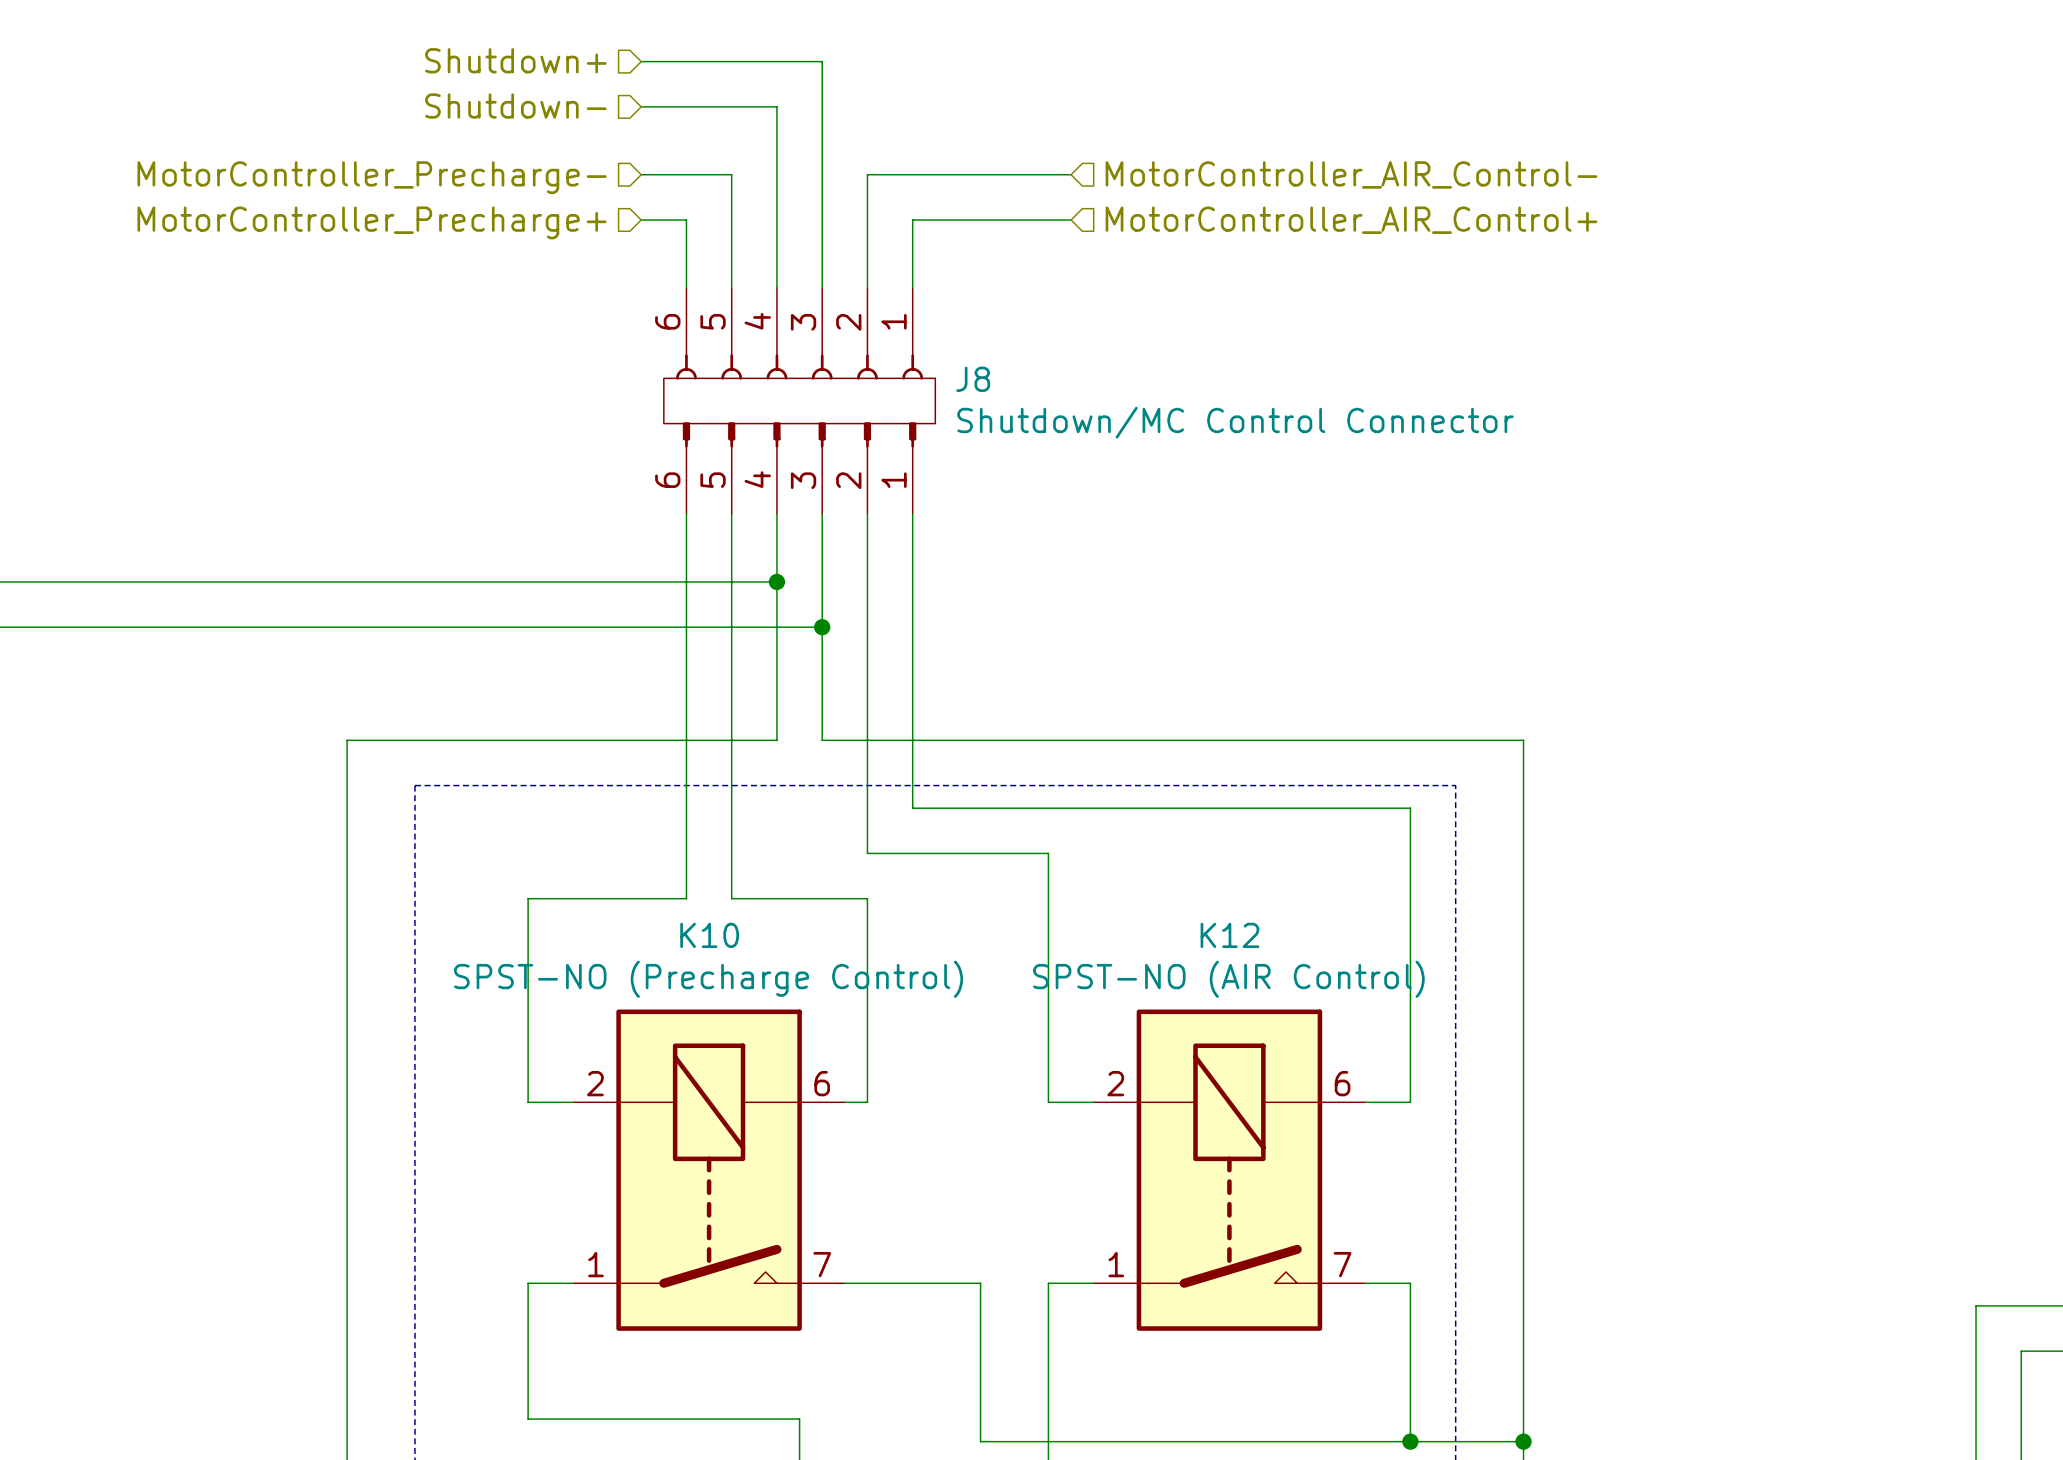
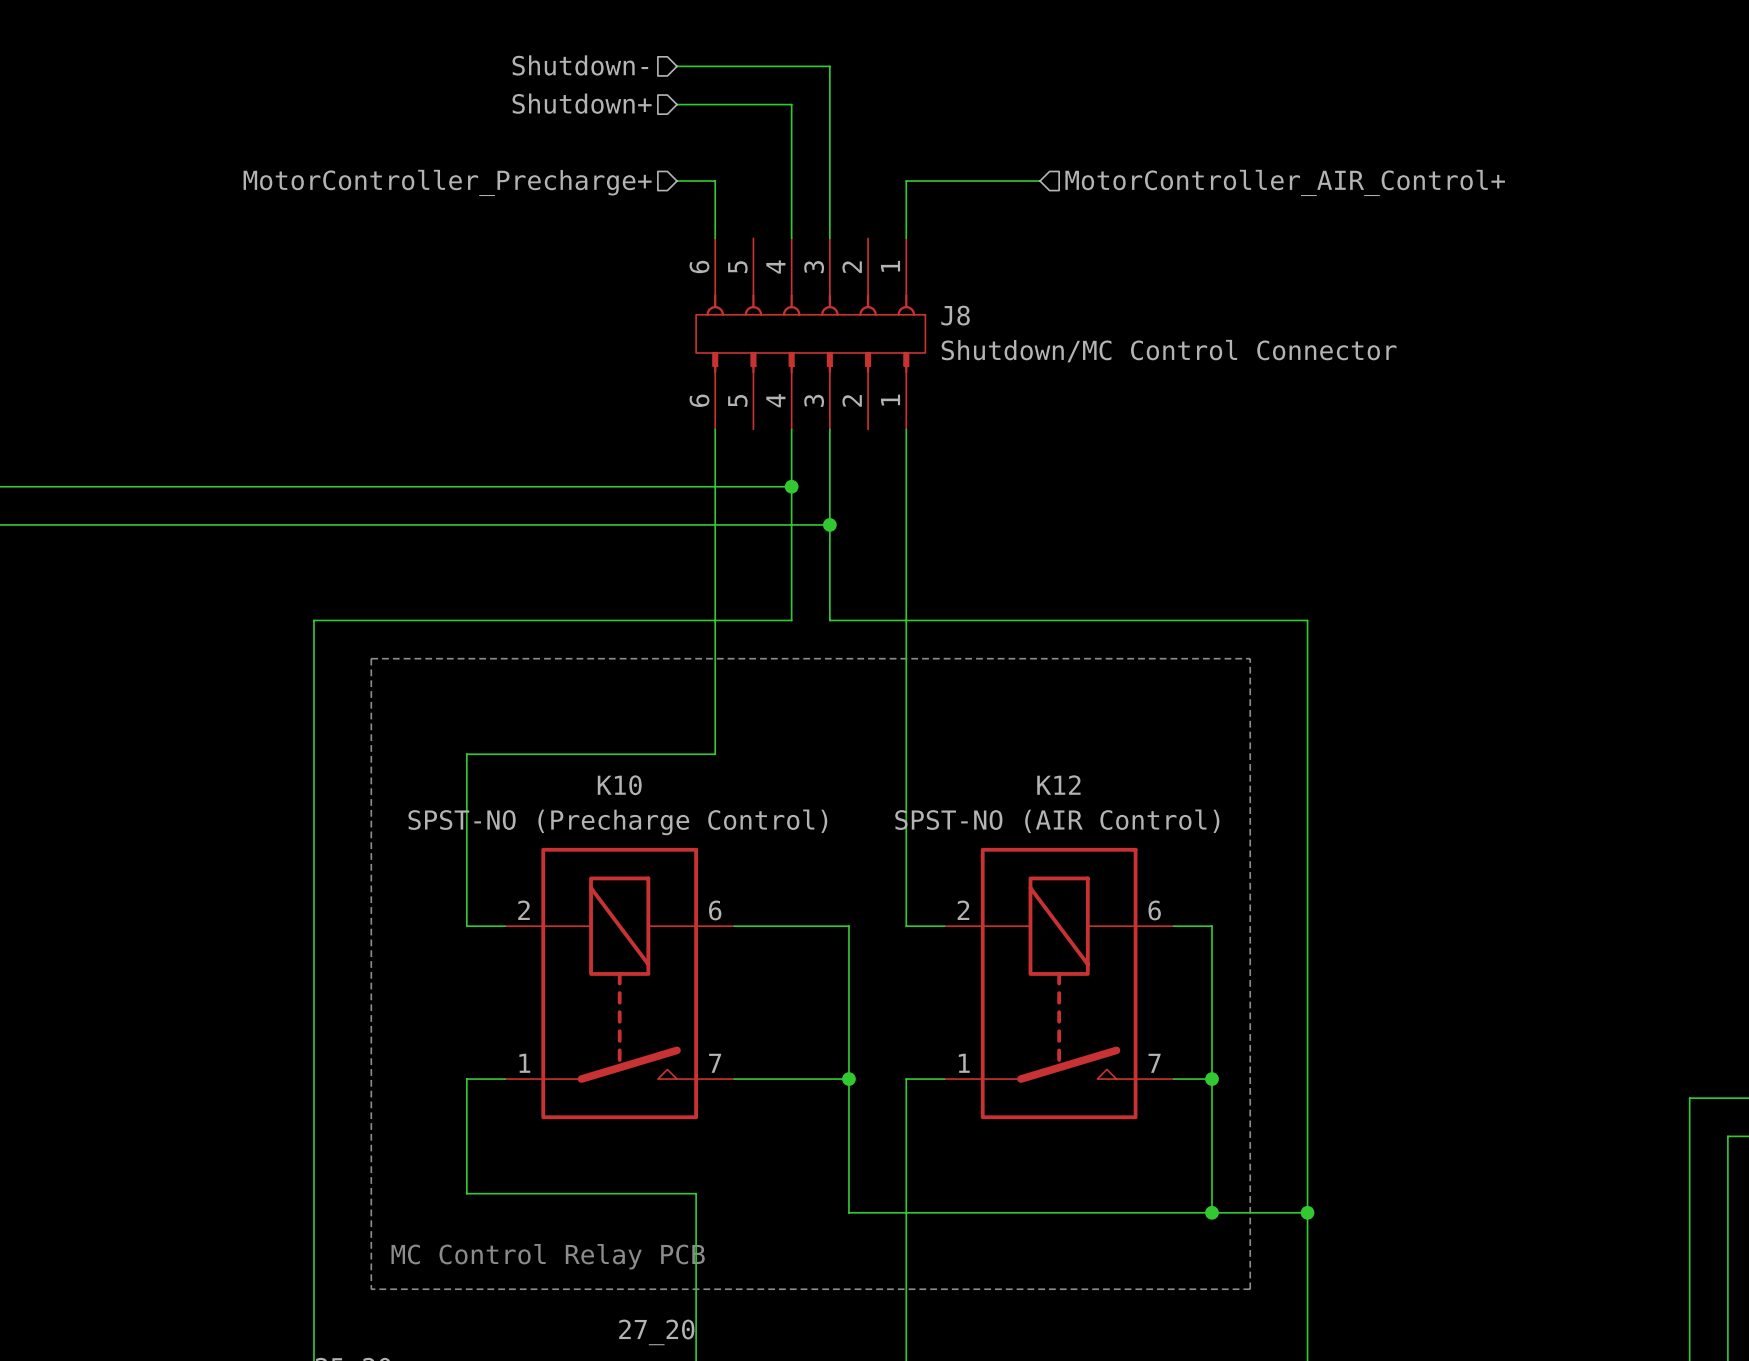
hierarchical label position: Shutdown+ (515, 60) -> Shutdown+ (582, 103)
wire: (641, 61) (822, 61) (822, 219) -> (677, 181) (715, 181)
wire: none -> (677, 66) (829, 66) (829, 238)
hierarchical label position: Shutdown- (515, 106) -> Shutdown- (580, 65)
wire: (641, 106) (776, 106) (776, 287) -> none
wire: none -> (677, 104) (791, 104) (791, 181)
wire: (641, 174) (731, 174) (731, 287) -> none
wire: (1071, 174) (867, 174) (867, 287) -> none
hierarchical label: MotorController_AIR_Control- (1351, 174) -> none
hierarchical label: MotorController_Precharge- (372, 177) -> none
wire: (641, 219) (686, 219) (686, 287) -> none
wire: (912, 219) (1048, 219) -> (906, 238) (906, 181)
wire: none -> (925, 181) (1040, 181)
hierarchical label position: MotorController_AIR_Control+ (1351, 220) -> MotorController_AIR_Control+ (1285, 182)
hierarchical label position: MotorController_Precharge+ (372, 222) -> MotorController_Precharge+ (447, 182)
J8 position: (799, 400) -> (810, 333)
wire: (686, 514) (686, 898) -> (638, 754) (600, 754)
wire: (731, 514) (731, 898) -> none
wire: (776, 514) (776, 740) -> (829, 429) (829, 620)
wire: (867, 514) (867, 853) (1048, 853) -> (906, 429) (906, 716)
wire: none -> (677, 486) (791, 486)
junction: (776, 581) -> none
junction: none -> (791, 486)
wire: none -> (715, 524) (829, 524)
junction: (822, 627) -> none
junction: none -> (829, 524)
wire: (957, 740) (912, 740) (912, 808) (1410, 808) (1410, 1102) -> (1212, 1079) (1212, 926)
wire: (822, 898) (867, 898) (867, 1102) -> (715, 754) (715, 620) (677, 620)
wire: none -> (753, 926) (848, 926) (848, 1079)
junction: none -> (848, 1079)
junction: none -> (1212, 1079)

